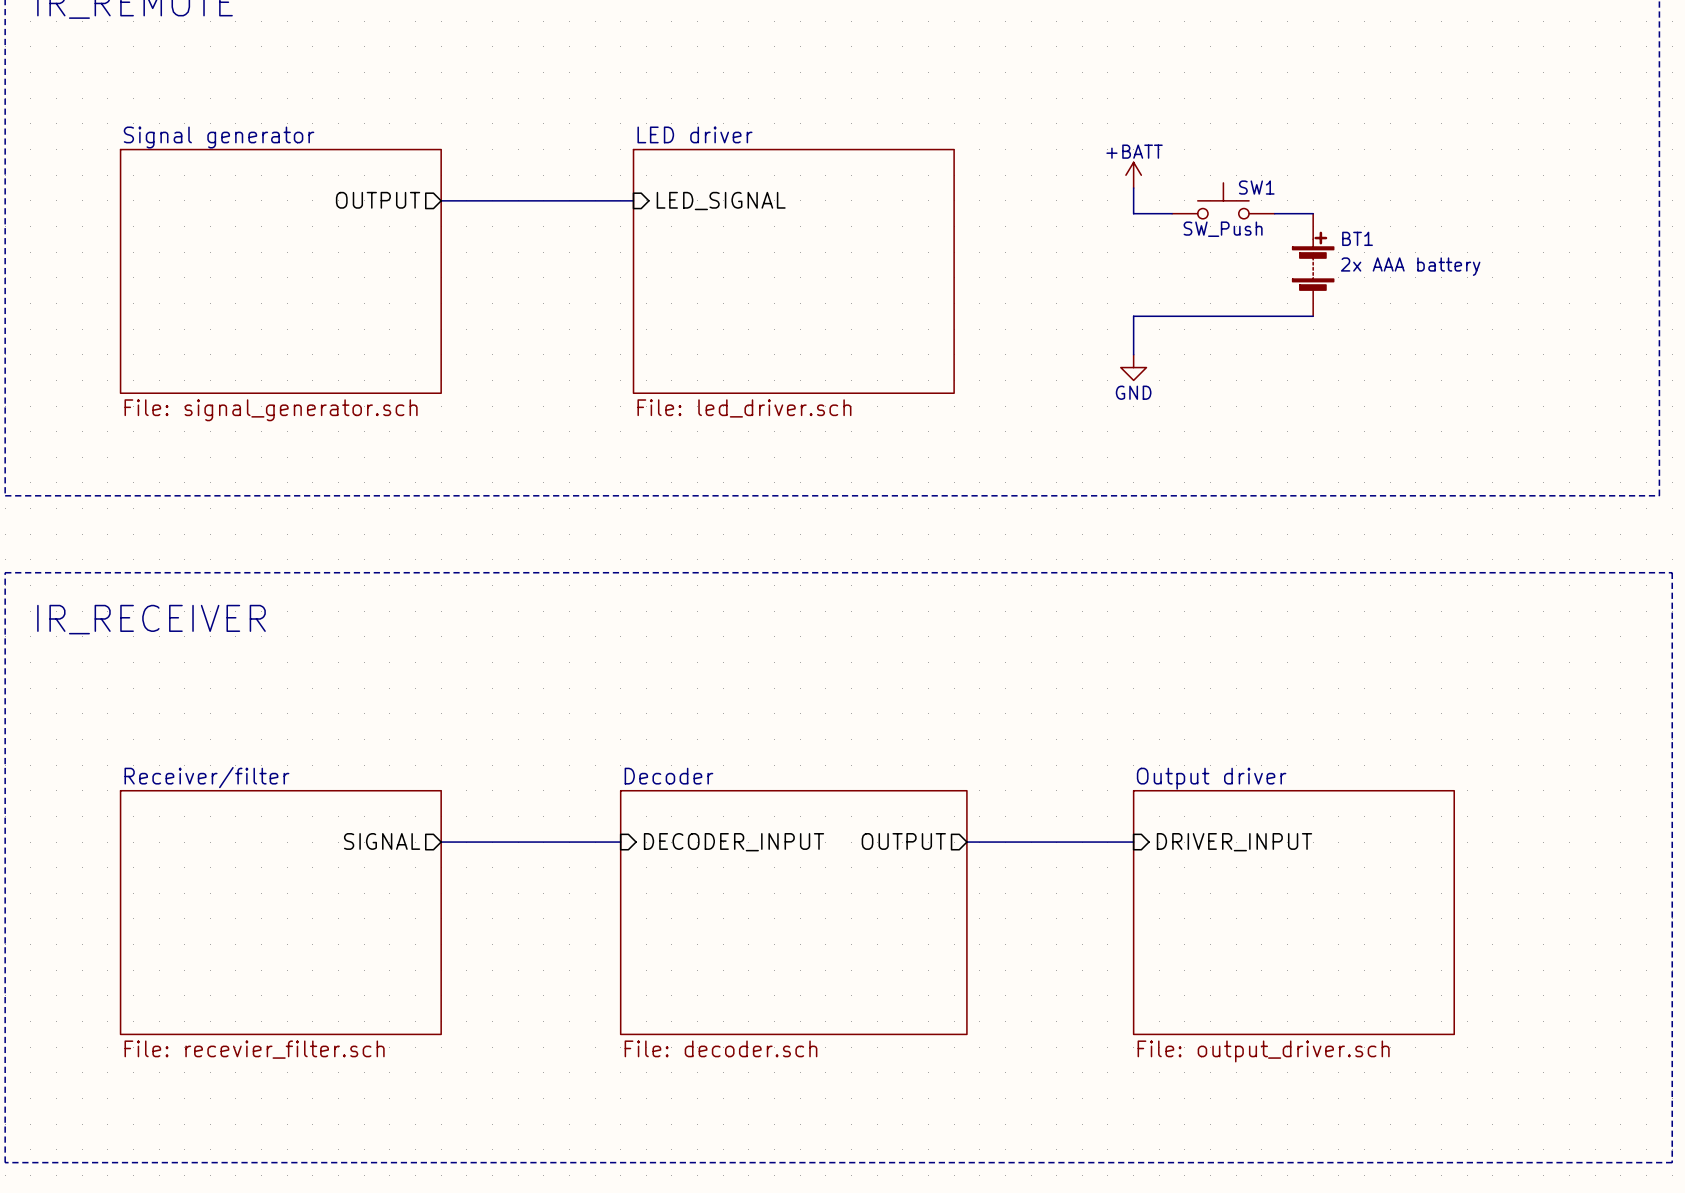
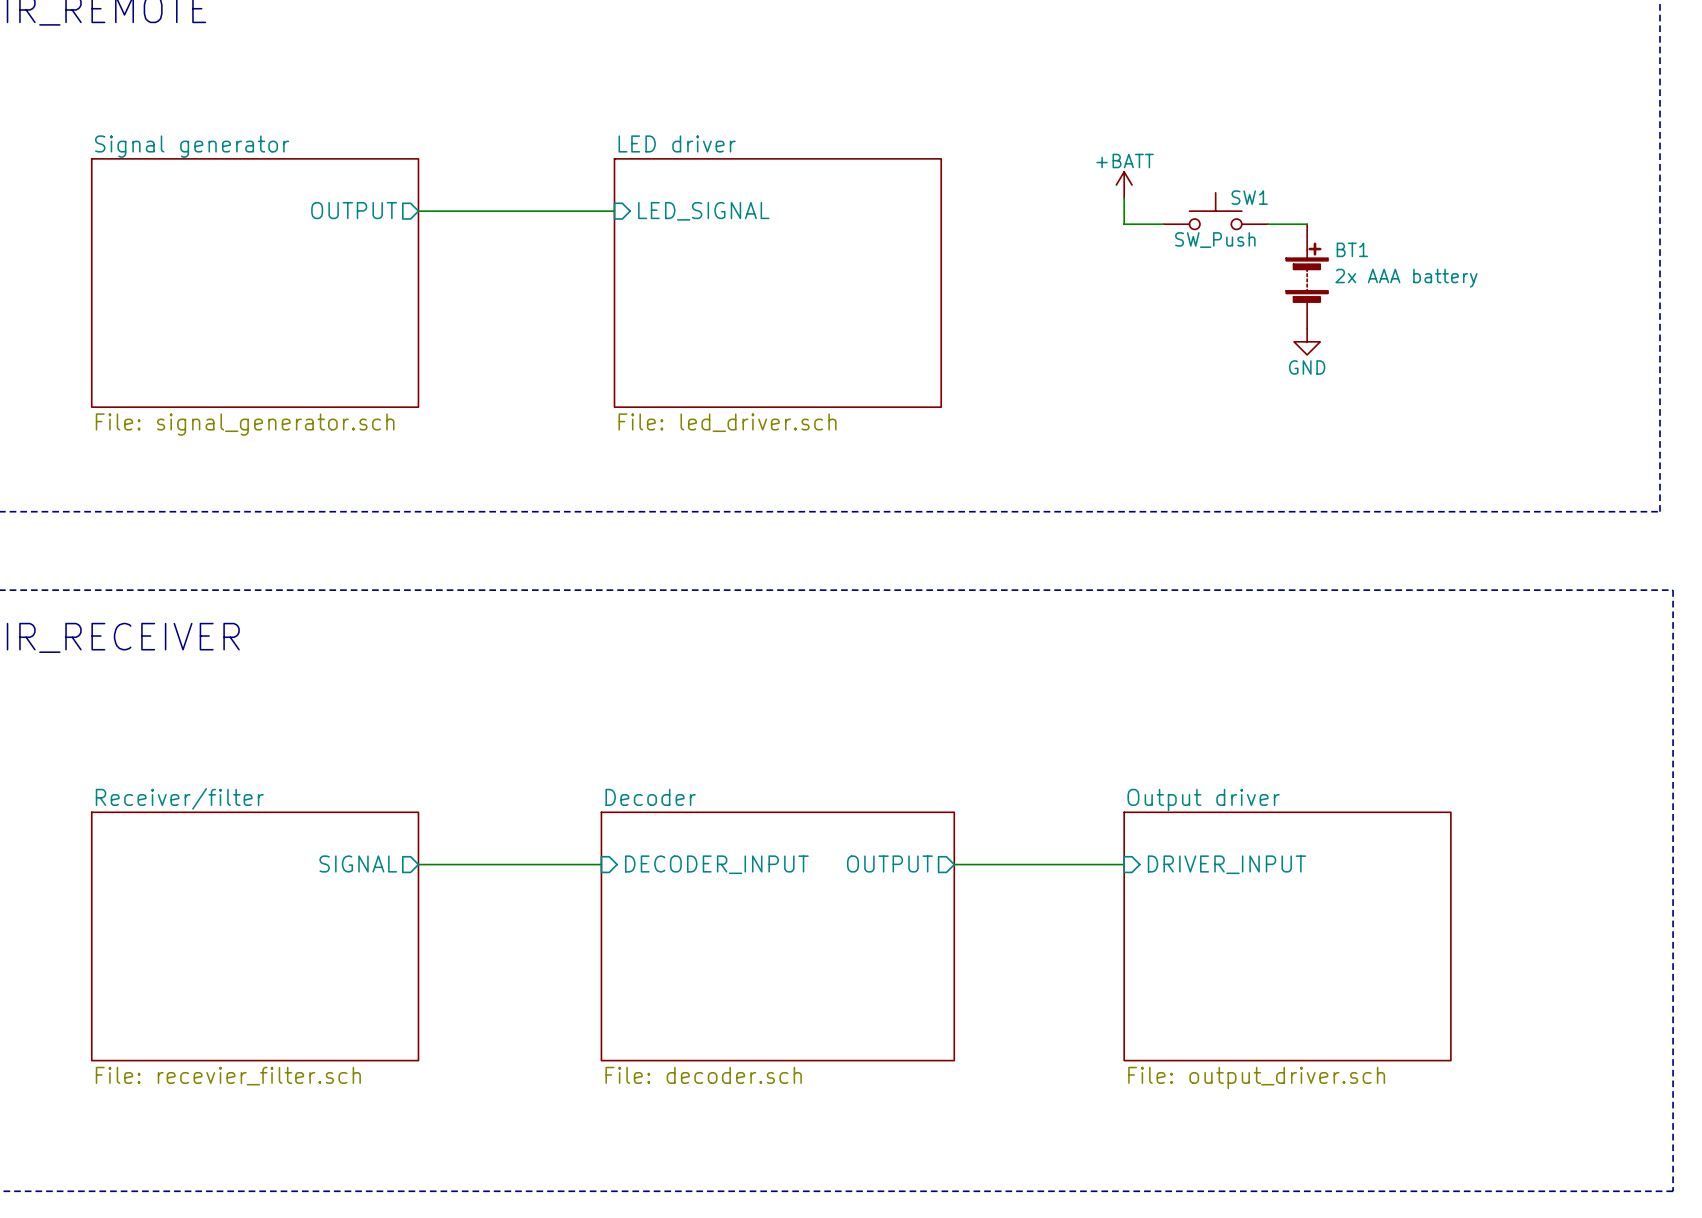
wire: (1313, 316) (1133, 316) (1133, 354) -> none
power symbol position: GND (1133, 367) -> GND (1307, 341)

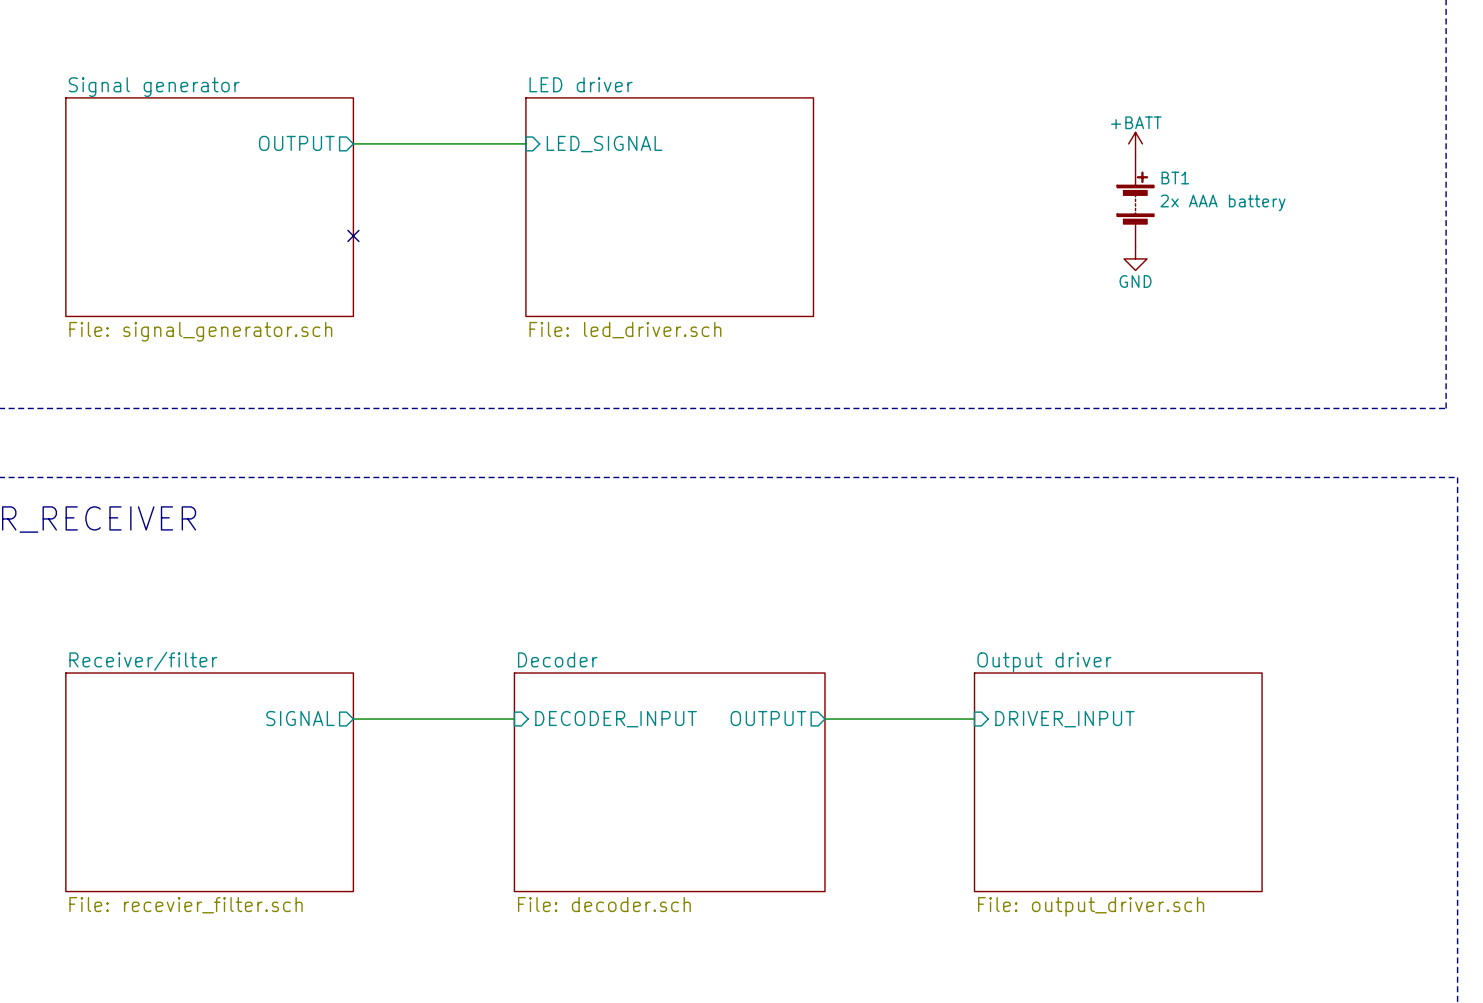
power symbol position: +BATT (1124, 185) -> +BATT (1135, 143)
wire: (1124, 198) (1124, 224) (1163, 224) -> none
SW1: SW_Push (1215, 211) -> none
wire: (1267, 224) (1307, 224) -> none
no-connect mark: none -> (353, 235)

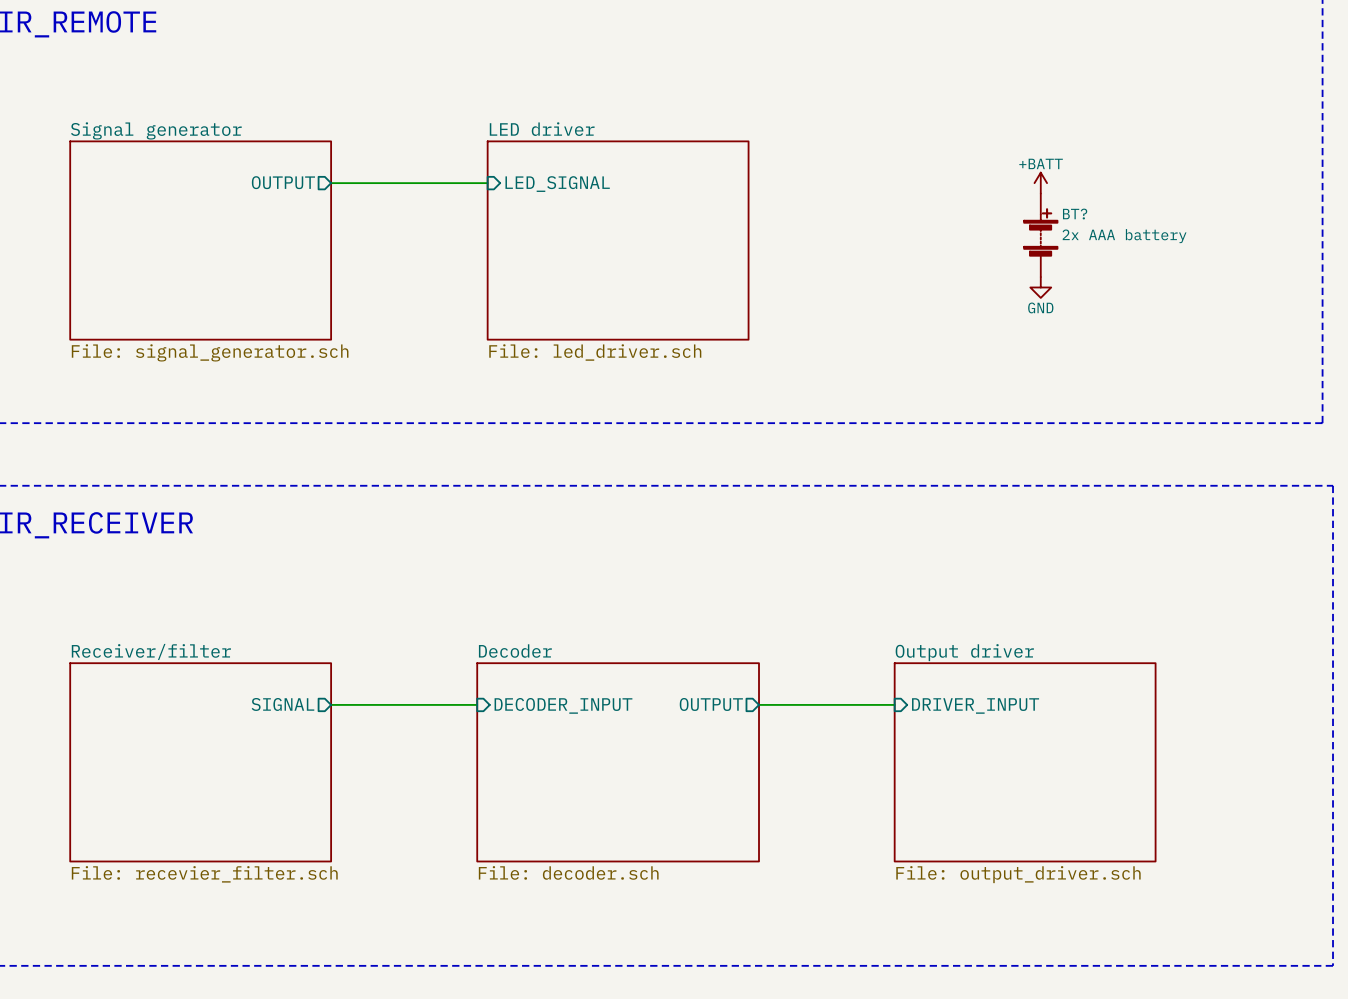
BT1 name: BT1 (1175, 178) -> BT? (1075, 214)
no-connect mark: (353, 235) -> none

